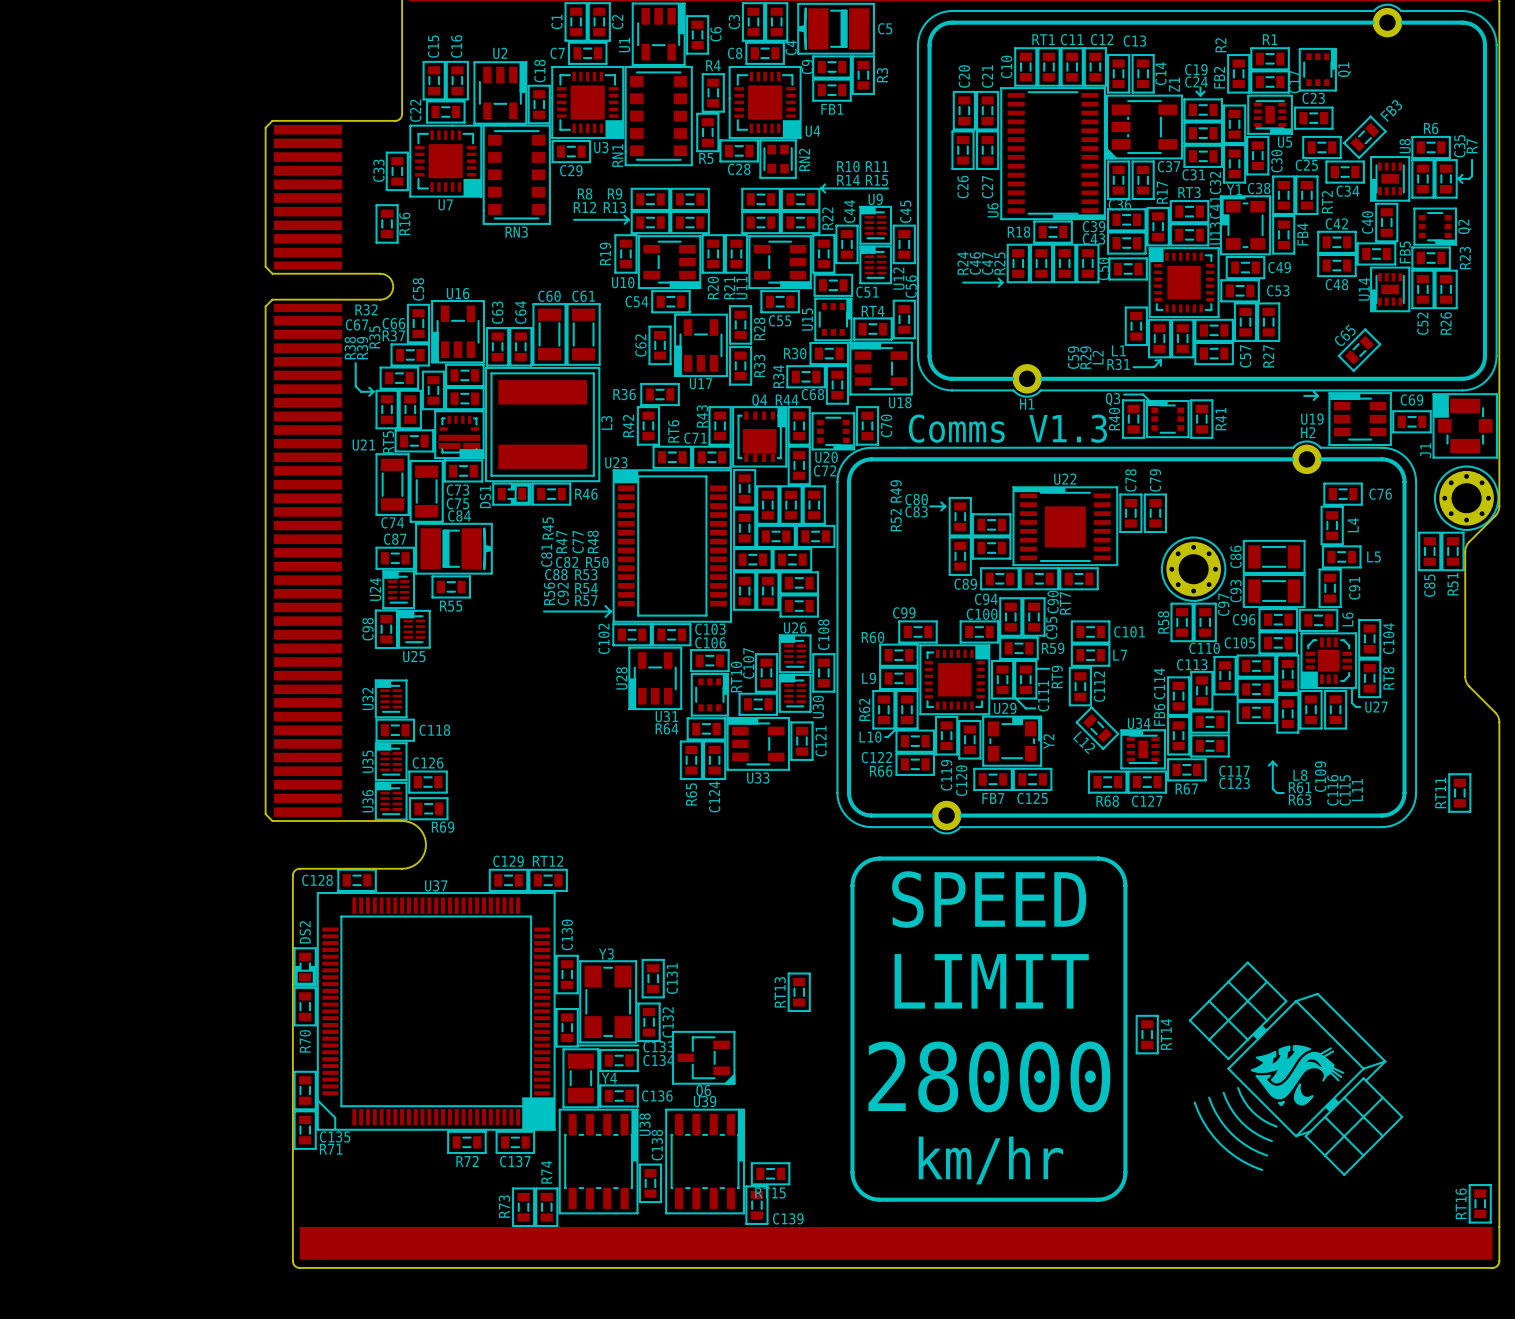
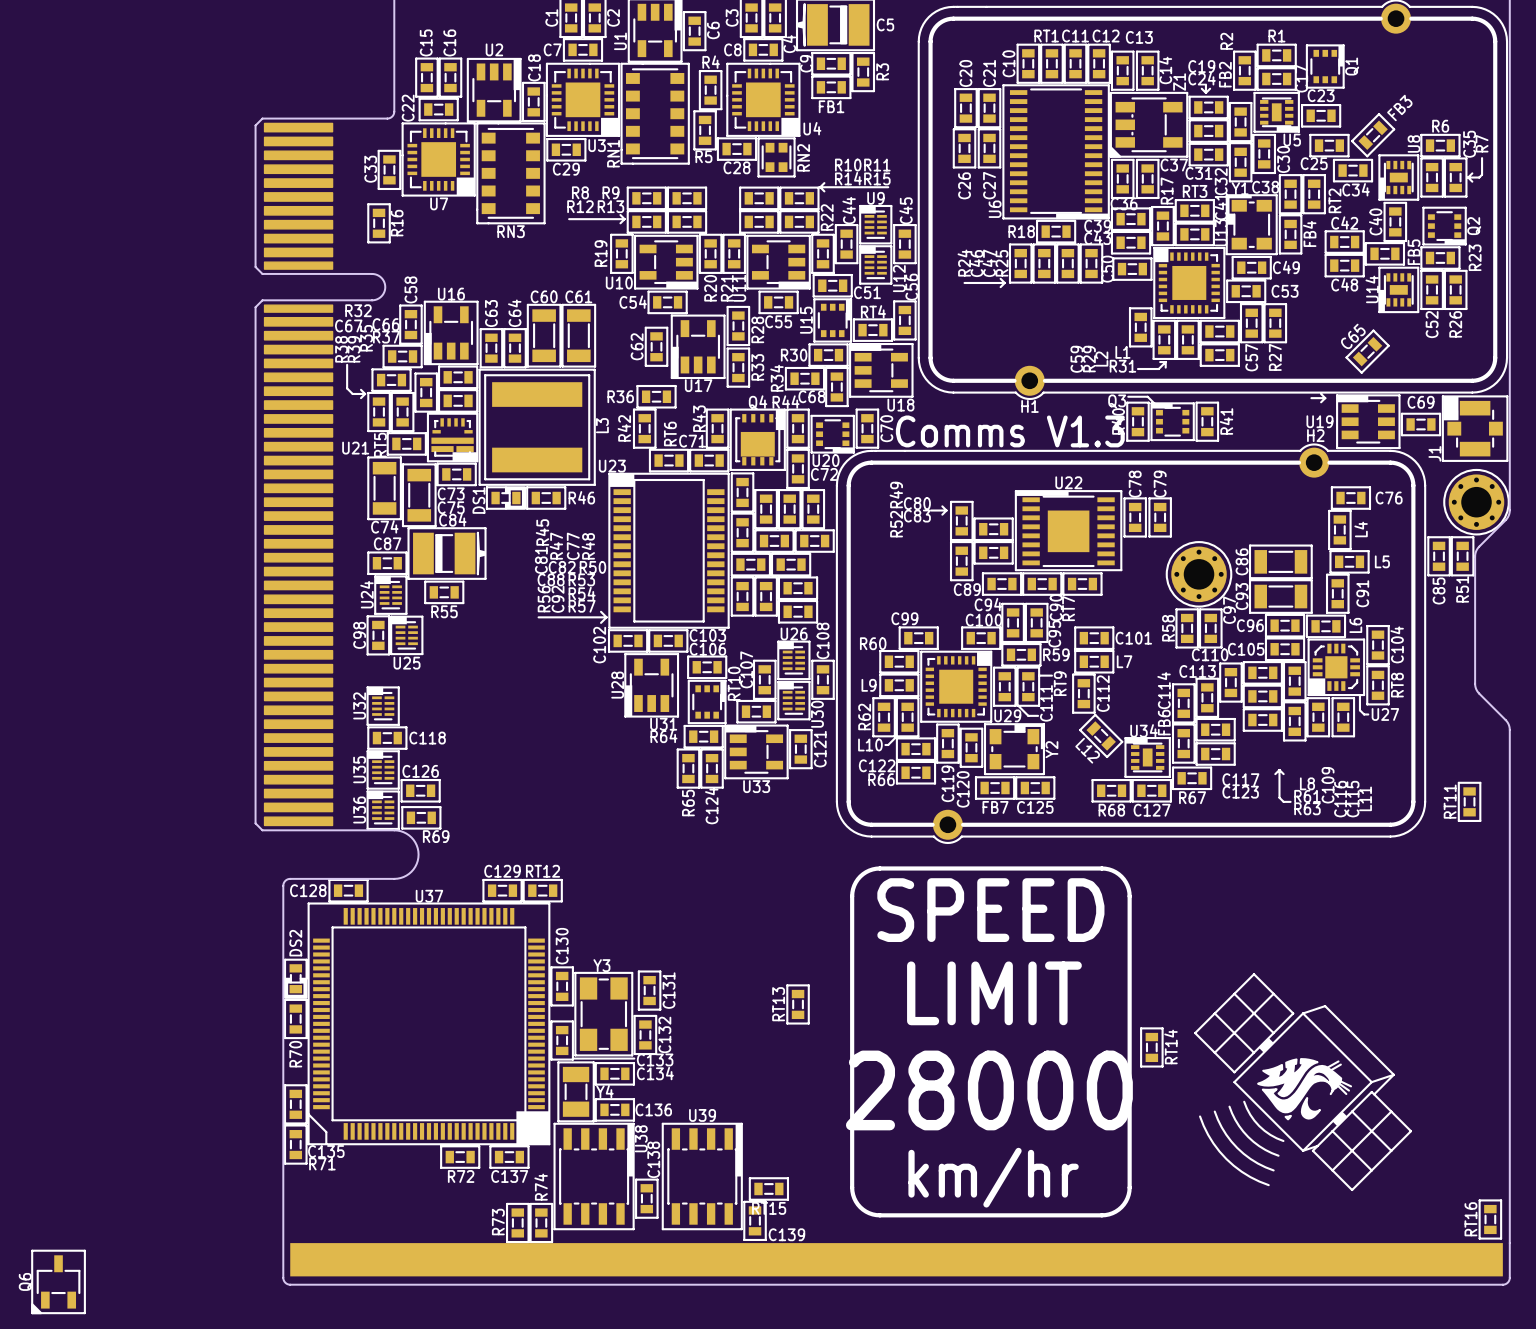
Q6 rotation: 0° (703, 1057) -> 90° clockwise (58, 1281)
Q6 position: (703, 1057) -> (58, 1281)

